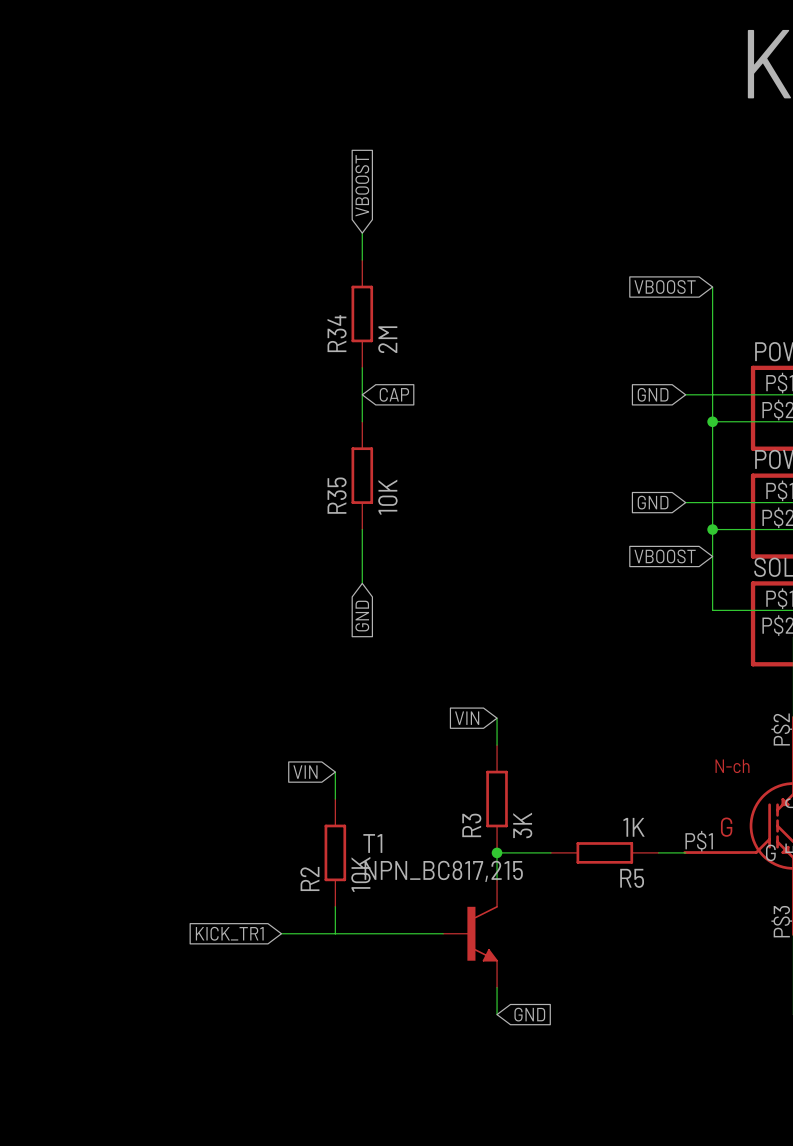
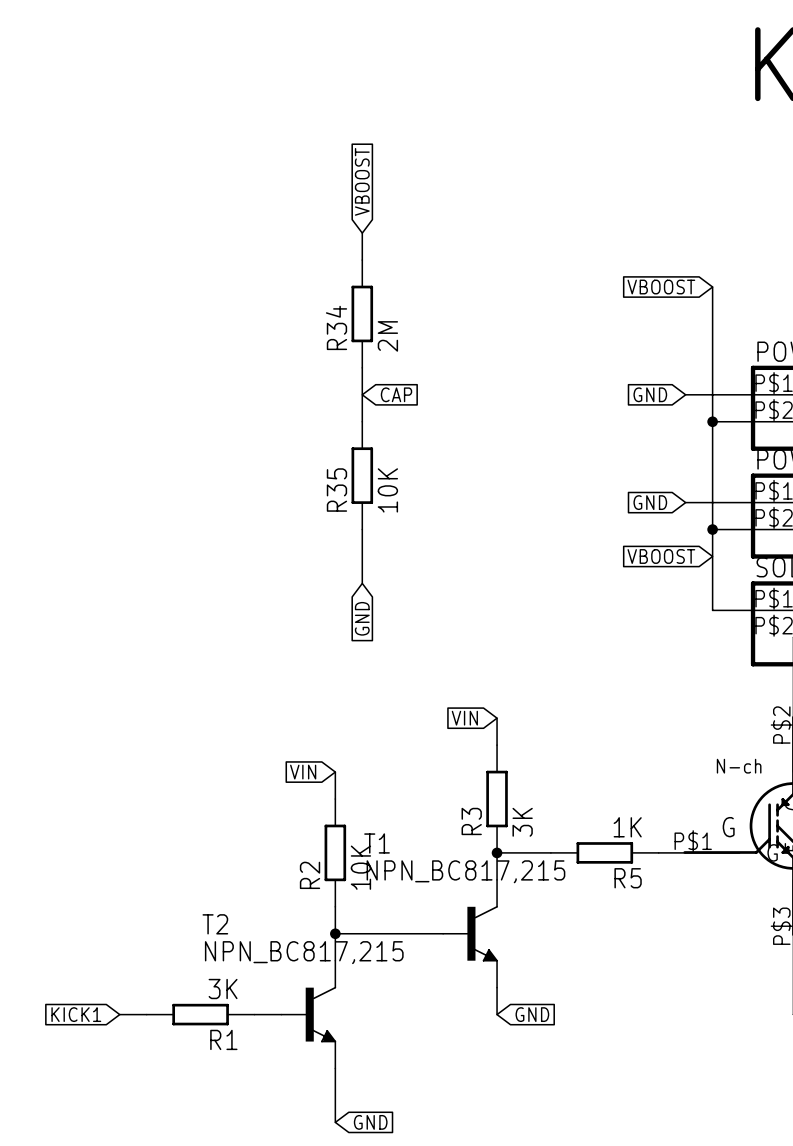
global label: KICK_TR1 (229, 933) -> none
wire: (281, 933) (335, 933) -> (335, 960) (335, 933)
junction: none -> (335, 933)
global label: none -> KICK1 (76, 1014)
wire: none -> (119, 1014) (146, 1014)
R1: none -> 3K (200, 1014)
wire: none -> (254, 1014) (281, 1014)
T2: none -> NPN_BC817,215 (308, 1014)
wire: none -> (335, 1068) (335, 1122)
global label: none -> GND (370, 1122)

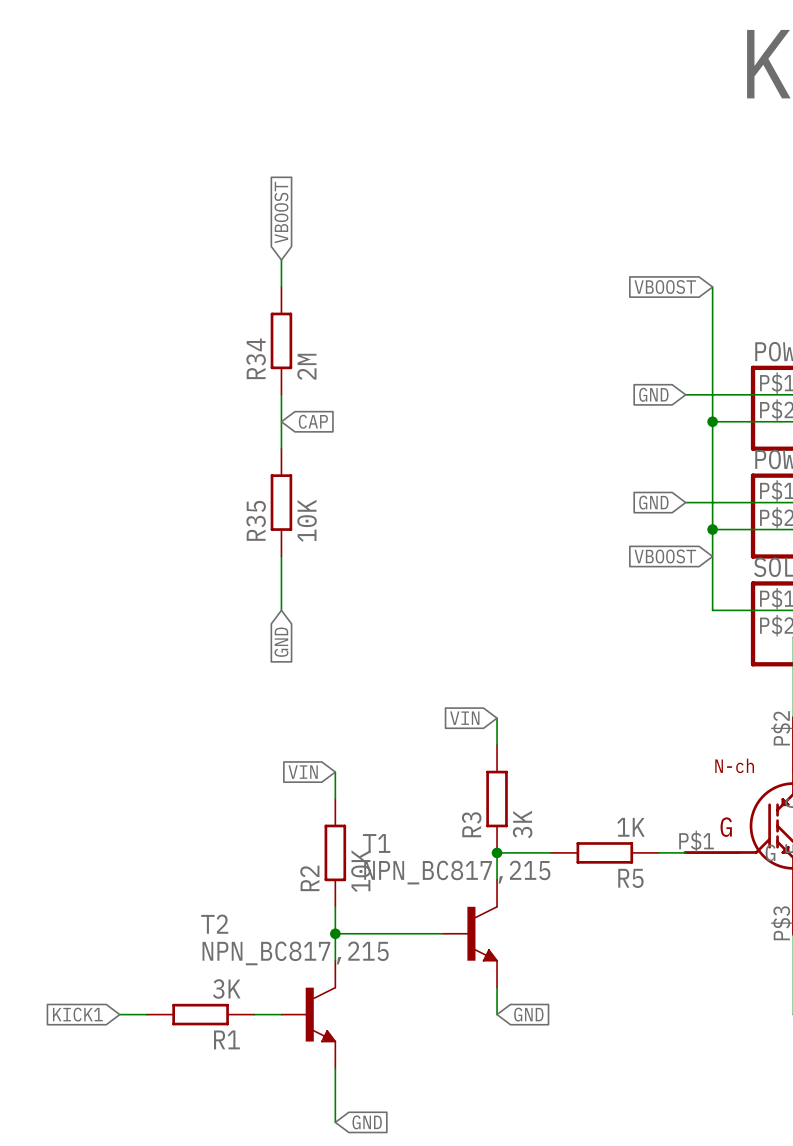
global label position: VBOOST (362, 181) -> VBOOST (281, 212)
wire: (362, 233) (362, 260) -> (281, 260) (281, 287)
R34 position: (362, 313) -> (281, 340)
wire: (362, 367) (362, 421) -> (281, 394) (281, 448)
global label position: CAP (396, 394) -> CAP (313, 421)
R35 position: (362, 475) -> (281, 502)
wire: (362, 529) (362, 583) -> (281, 556) (281, 610)
global label position: GND (362, 618) -> GND (281, 642)

